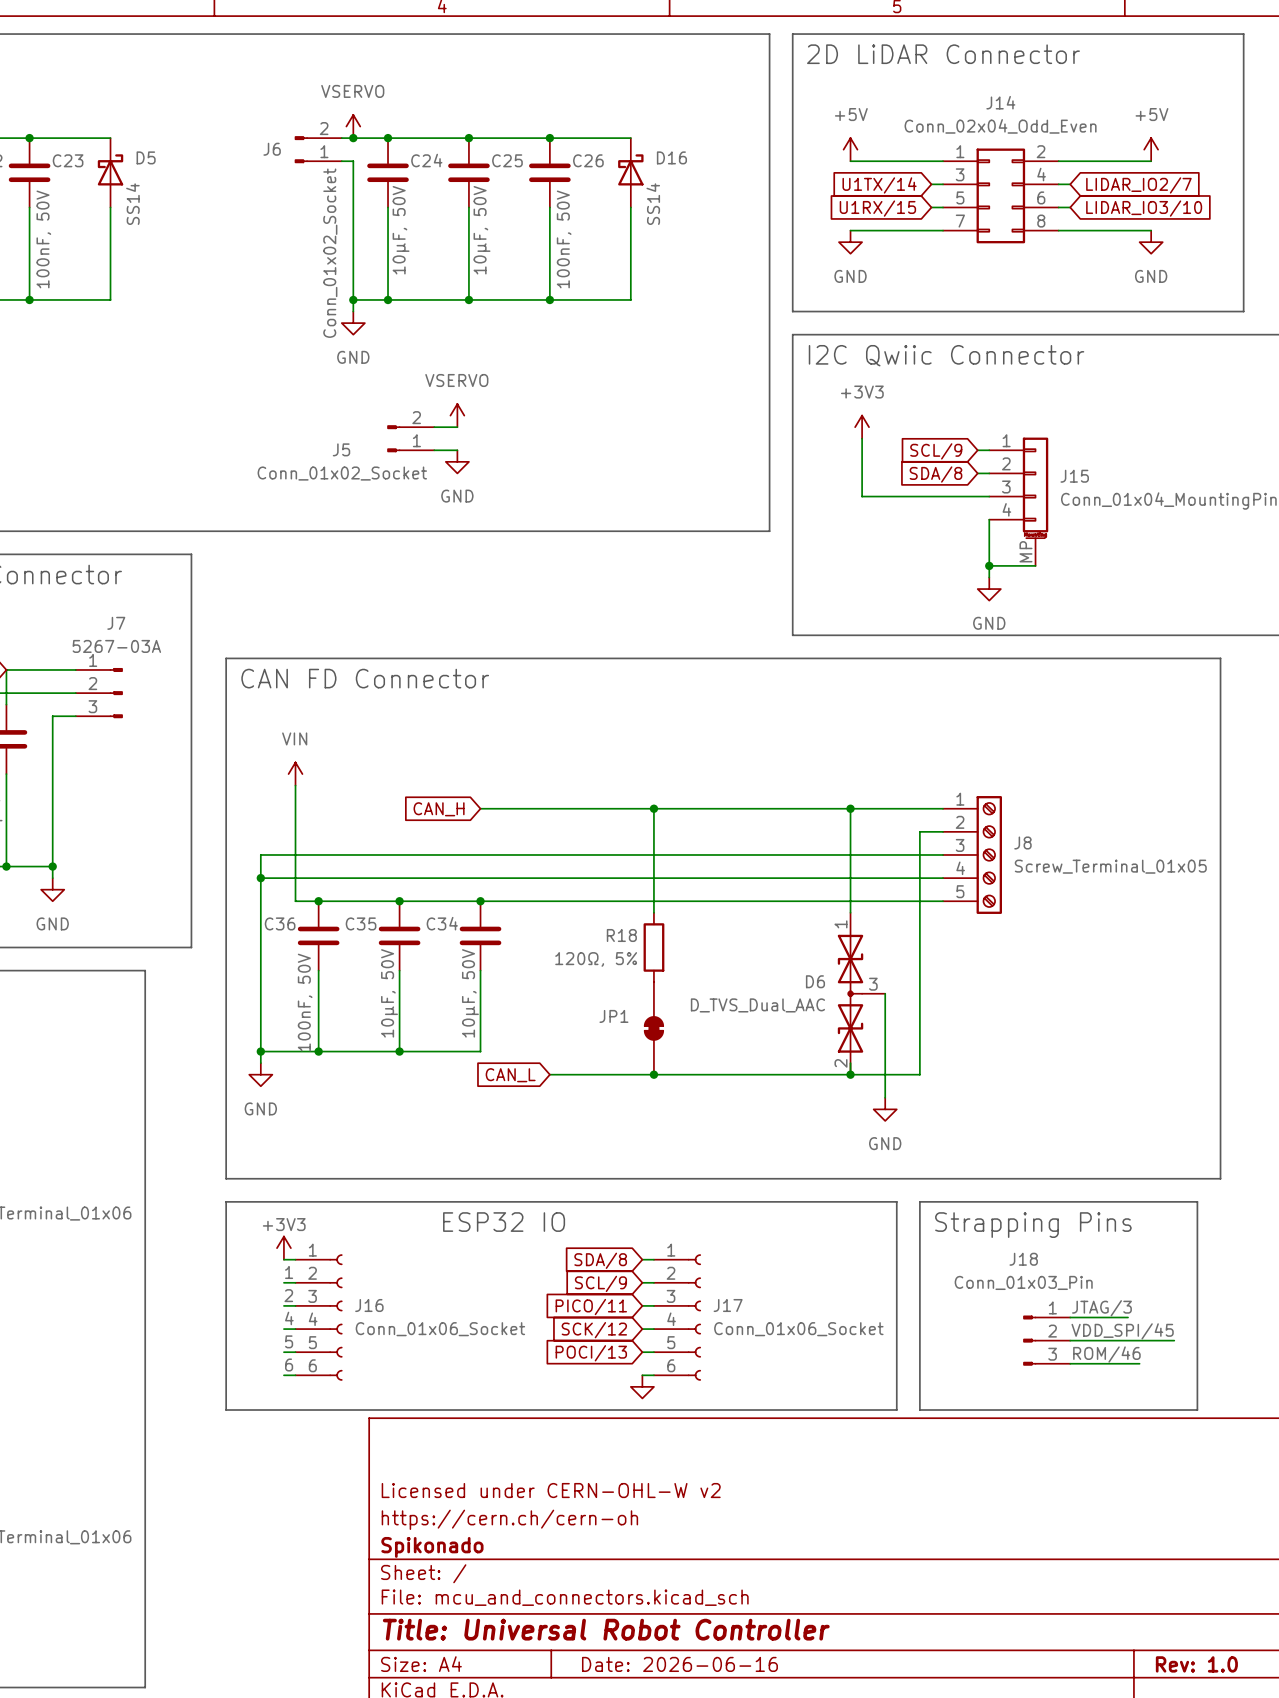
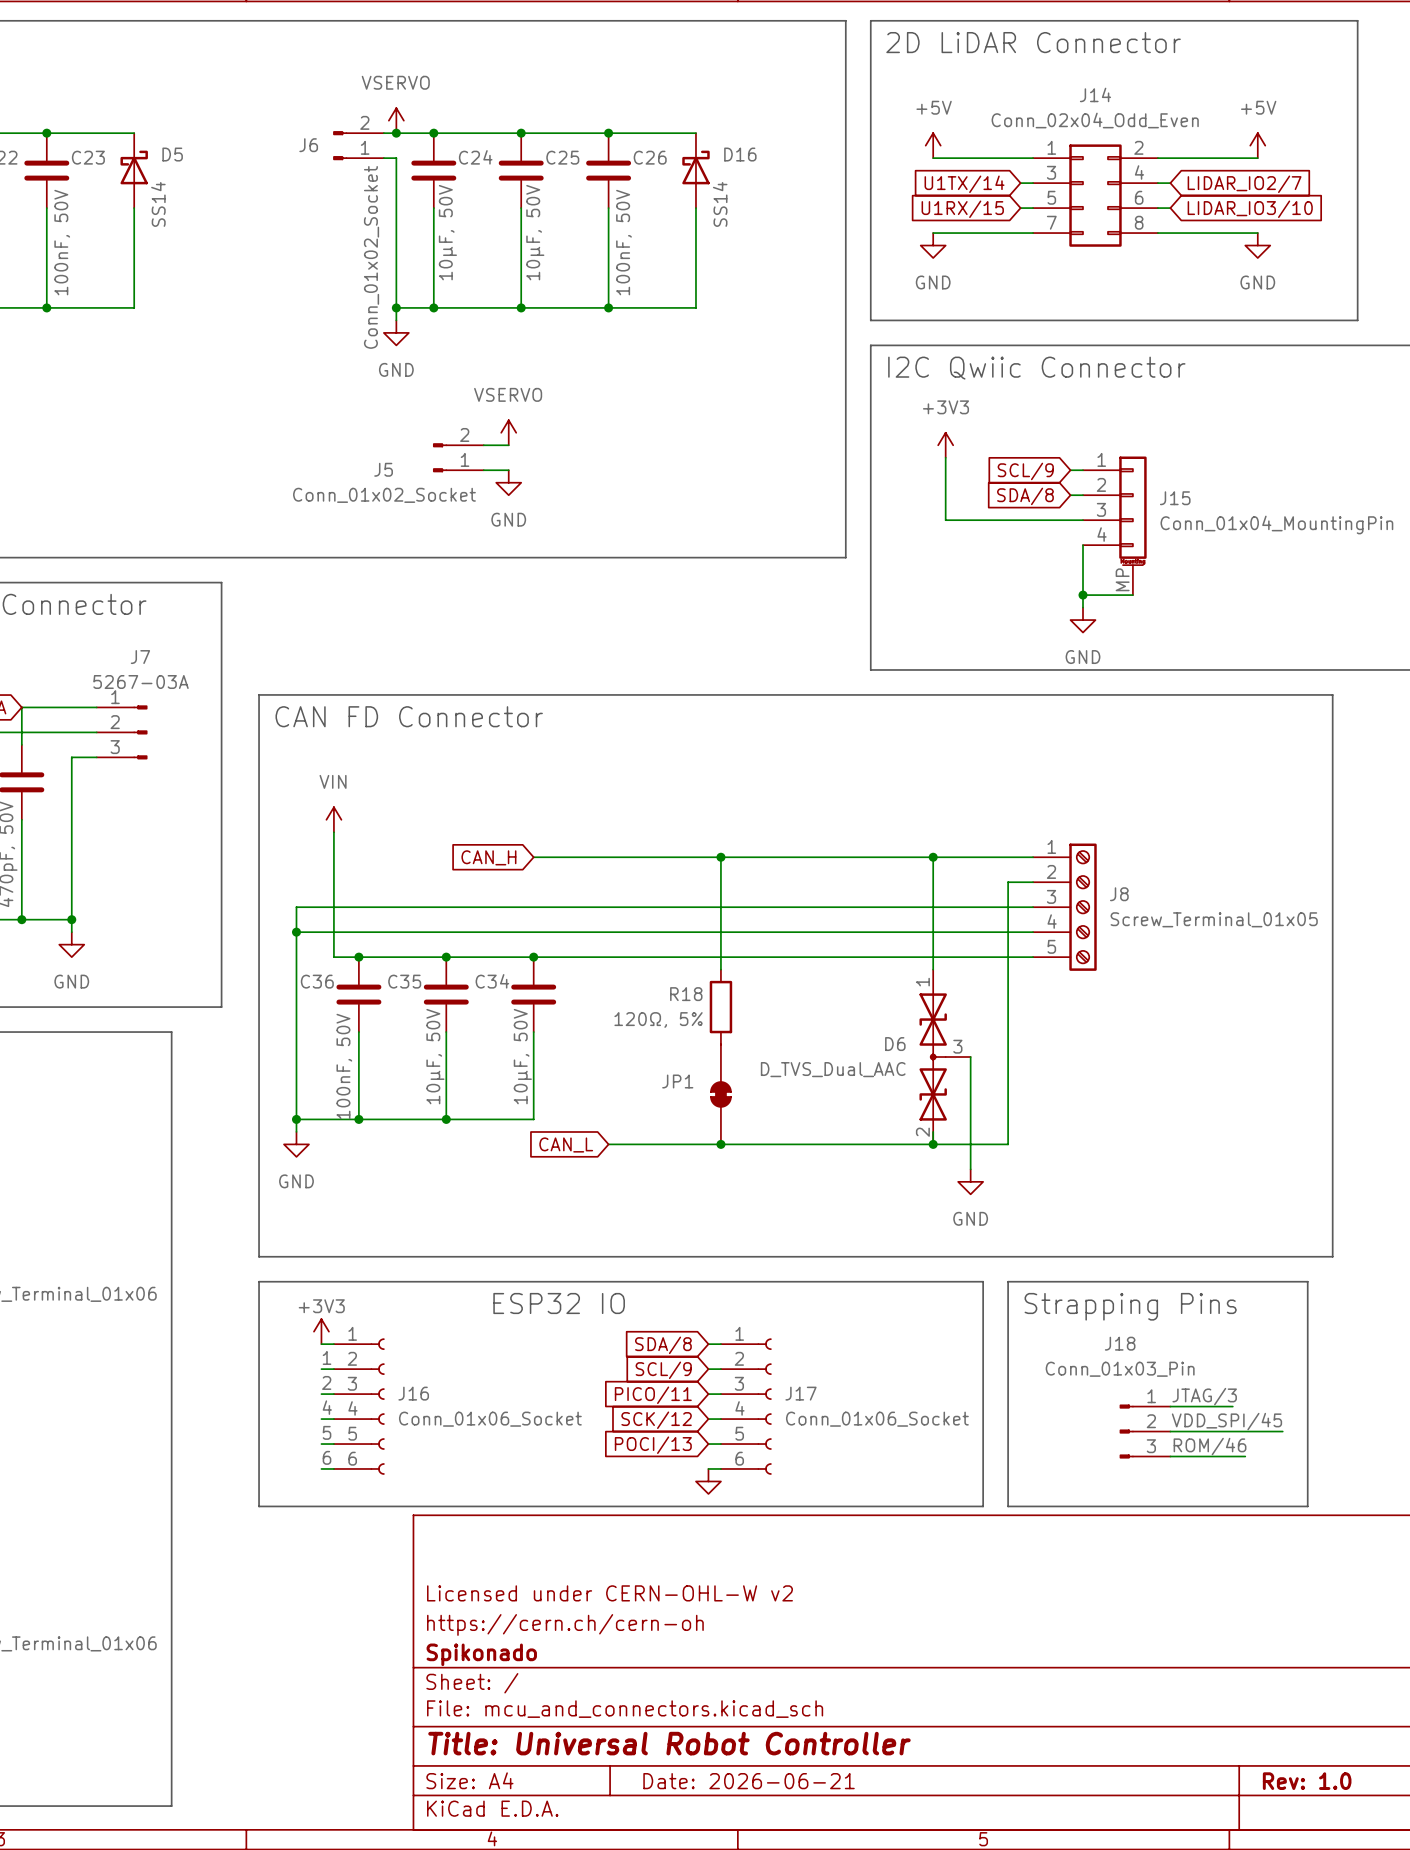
title block: Date: 2026-06-16 (679, 1664) -> Date: 2026-06-21 (749, 1781)

